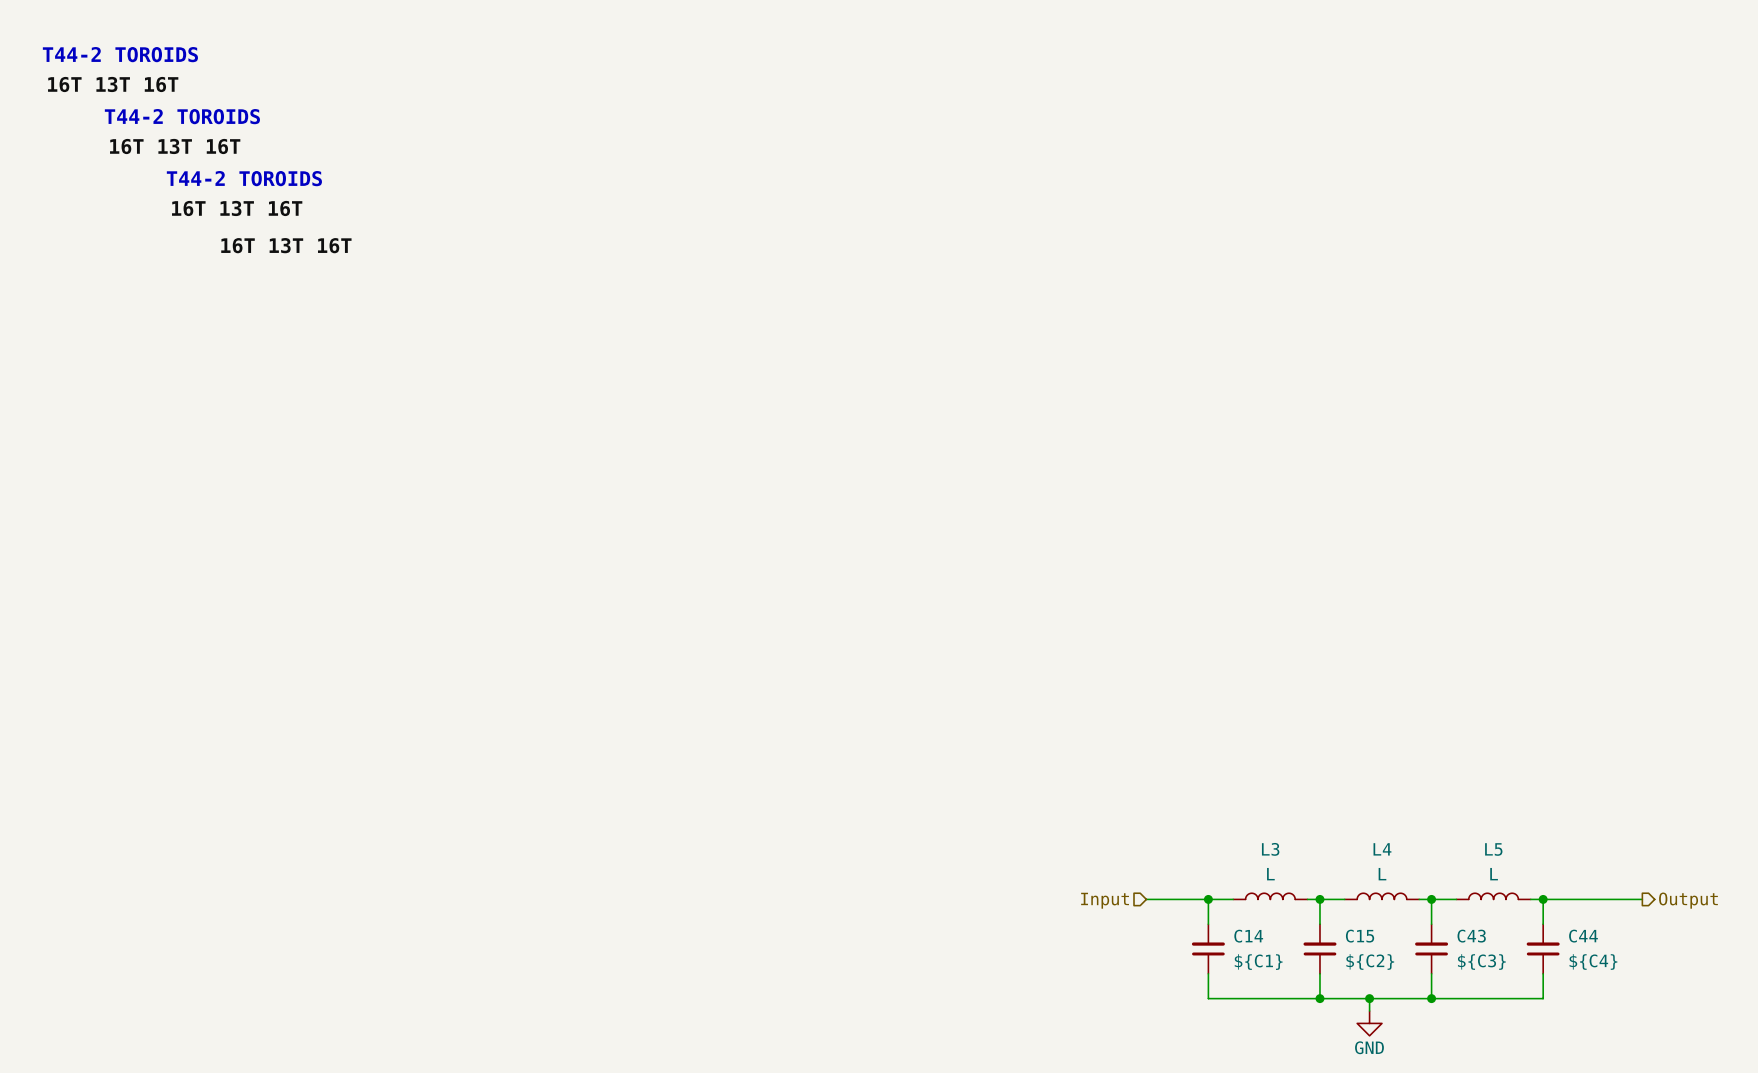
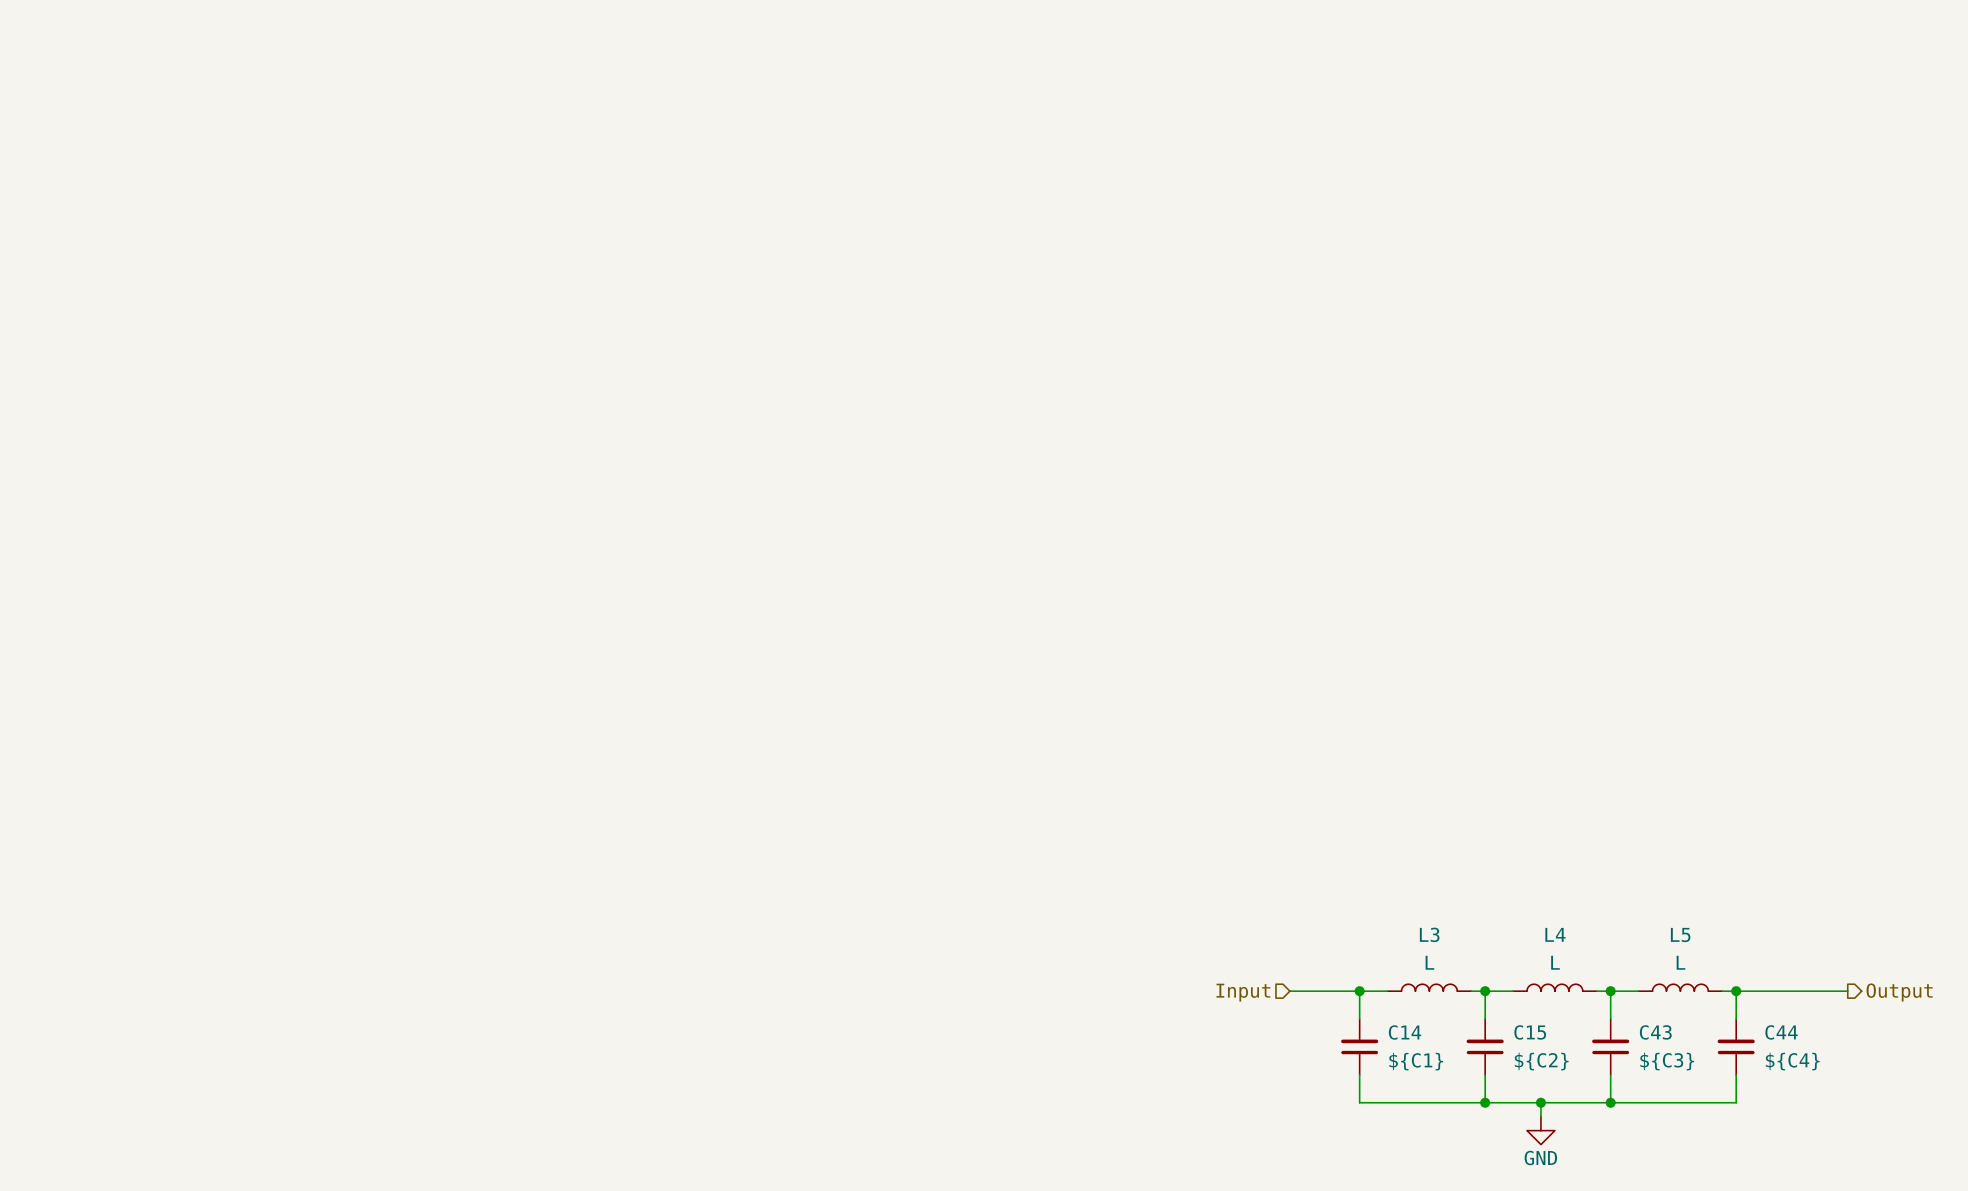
text: T44-2 TOROIDS (120, 54) -> none
label: 16T 13T 16T (113, 84) -> none
text: T44-2 TOROIDS (182, 116) -> none
label: 16T 13T 16T (175, 146) -> none
text: T44-2 TOROIDS (244, 178) -> none
label: 16T 13T 16T (237, 208) -> none
label: 16T 13T 16T (286, 245) -> none

